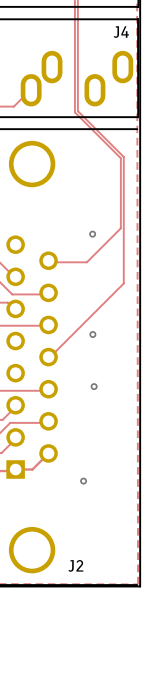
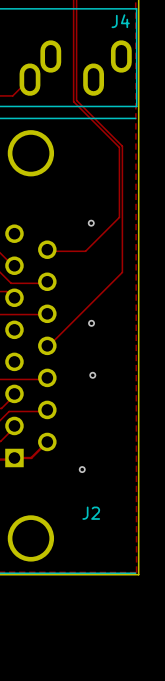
J2 name position: J2 (75, 565) -> J2 (91, 513)

